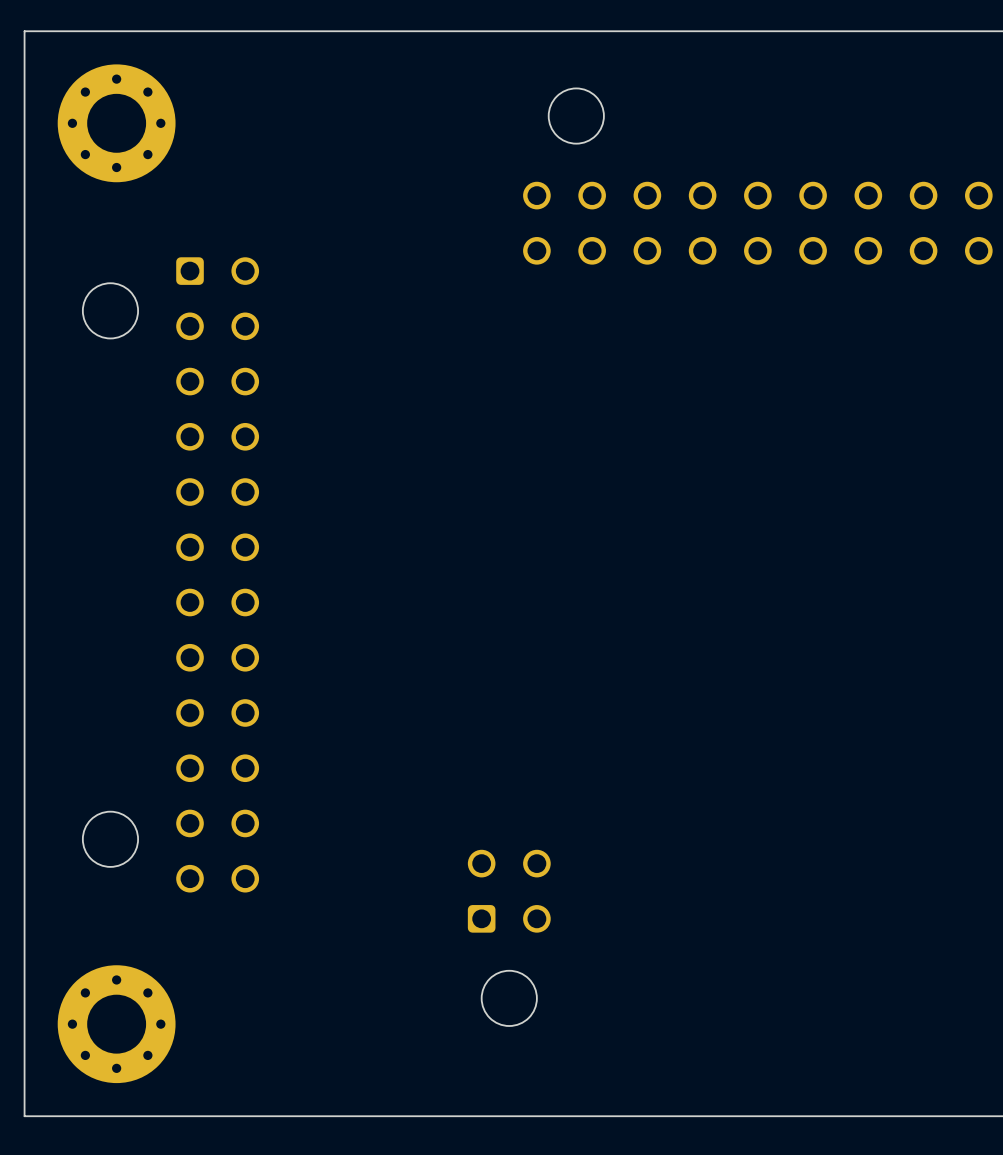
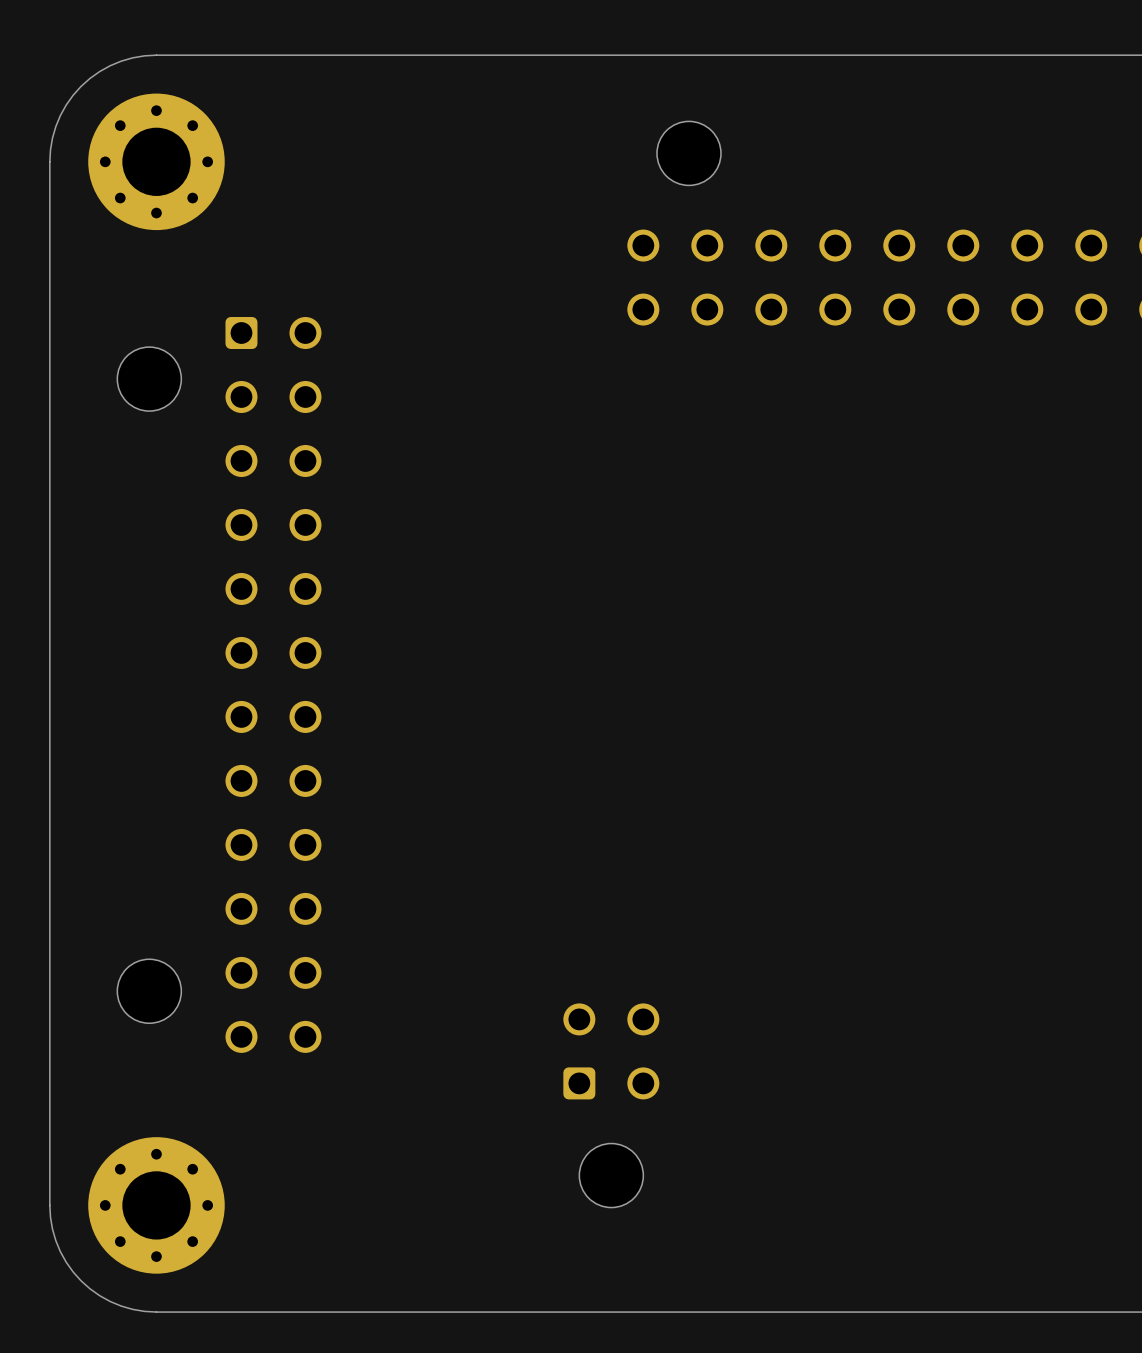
board edge: (116, 31) (24, 31) (24, 123) -> (156, 55) (121, 61) (99, 71) (81, 86) (60, 115) (52, 138) (49, 161)
board edge: (24, 1024) (24, 1116) (116, 1116) -> (49, 1205) (55, 1240) (66, 1262) (81, 1280) (110, 1301) (132, 1309) (156, 1312)

